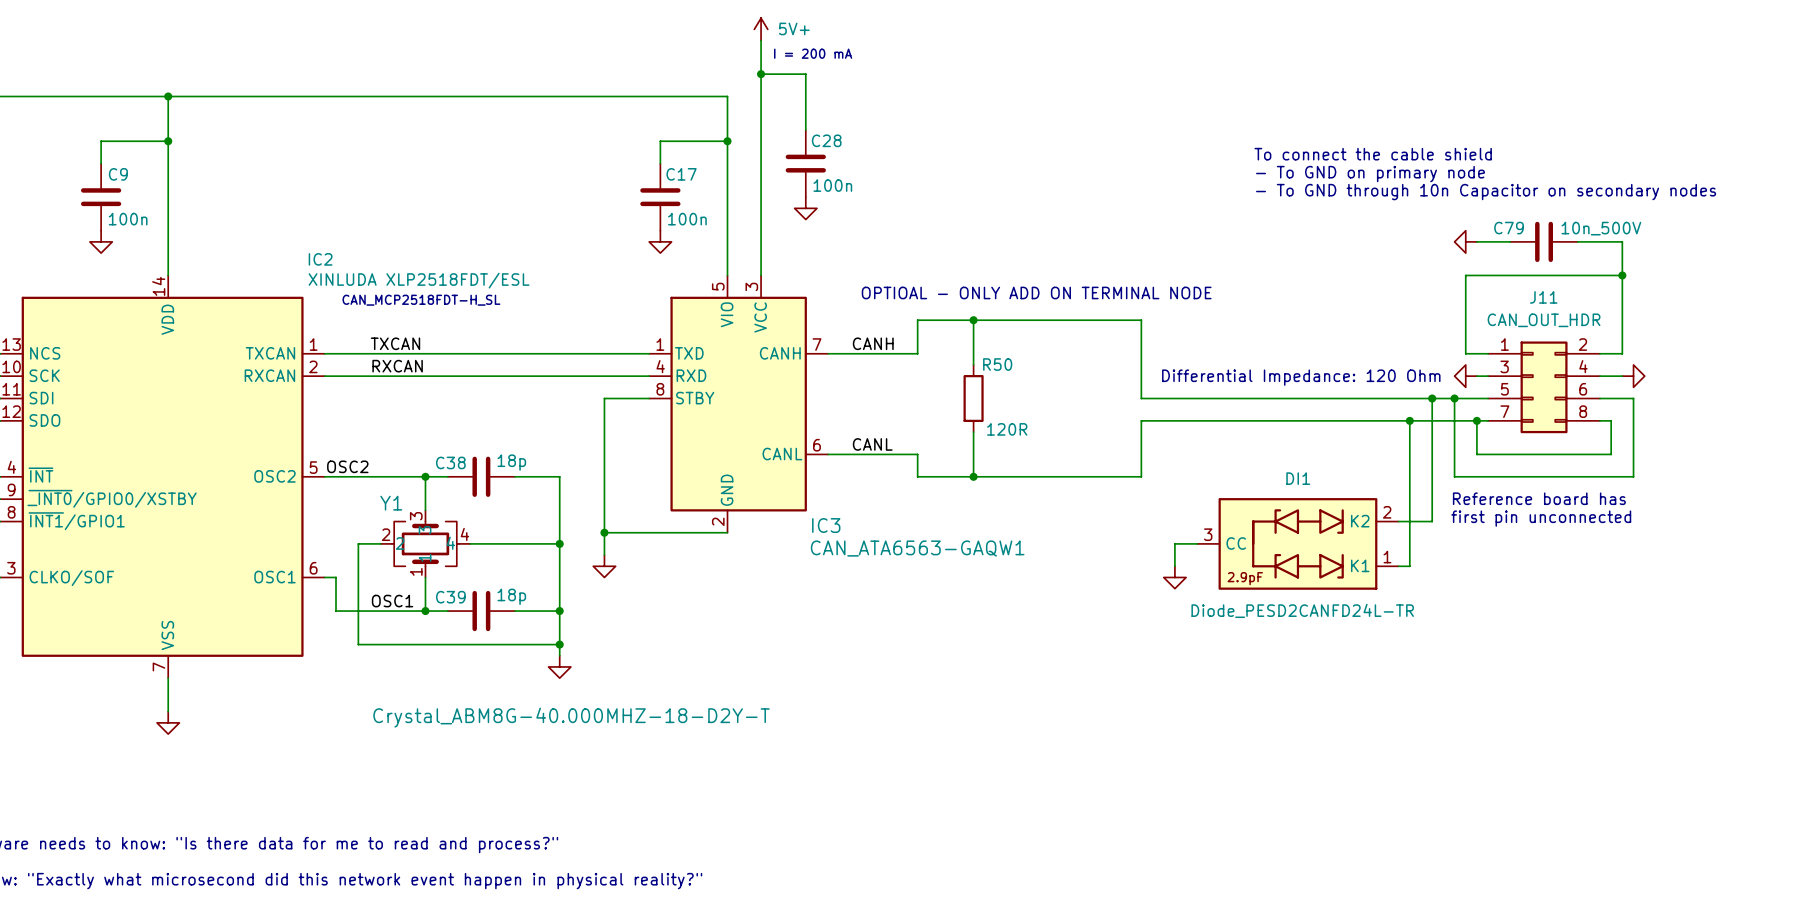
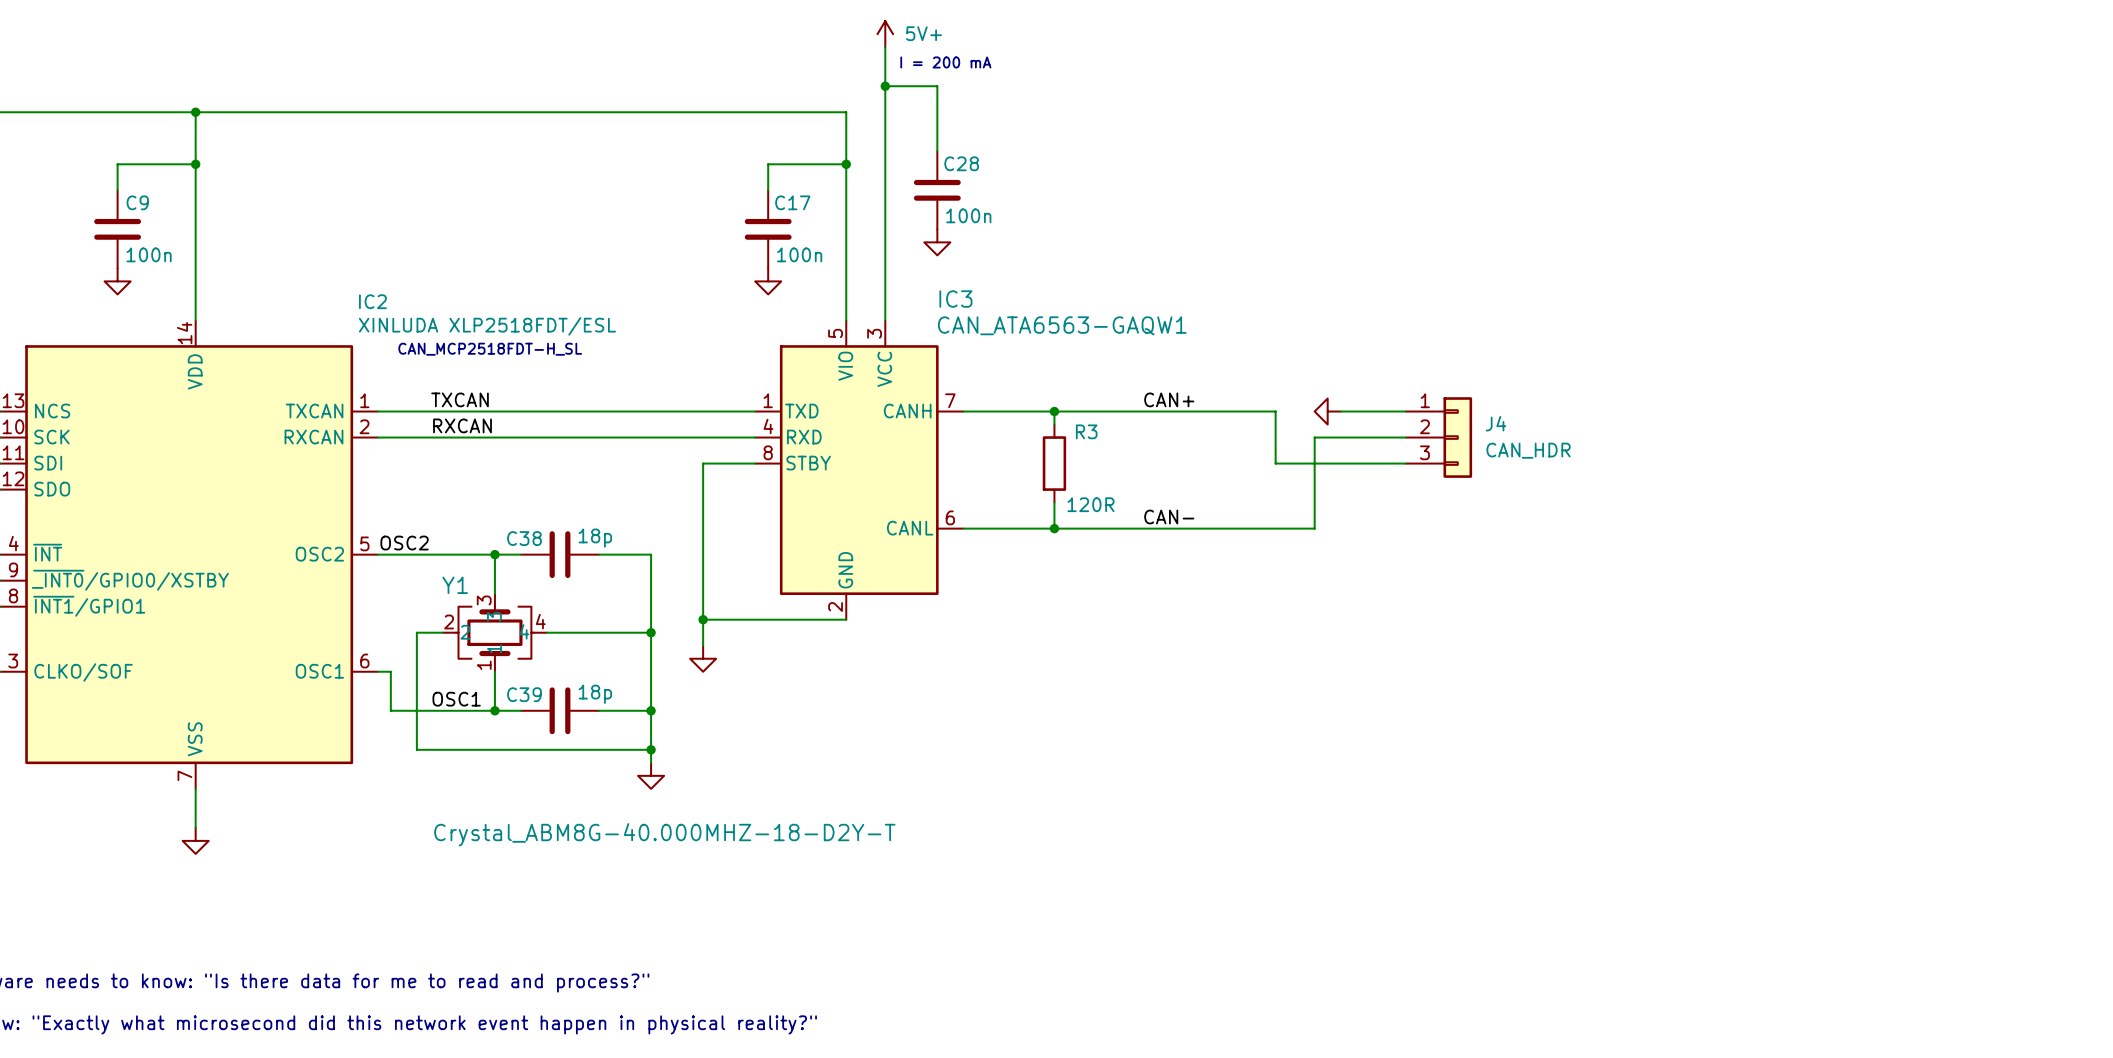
text: To connect the cable shield (1373, 154) -> none
text: - To GND on primary node (1370, 174) -> none
text: - To GND through 10n Capacitor on secondary nodes (1486, 192) -> none
power symbol: (1465, 241) -> none
wire: (1476, 241) (1510, 241) -> none
C79: 10n_500V (1544, 241) -> none
wire: (1577, 241) (1622, 241) (1622, 353) (1599, 353) -> none
wire: (1622, 275) (1465, 275) (1465, 353) (1488, 353) -> none
junction: (1622, 275) -> none
text: OPTIOAL - ONLY ADD ON TERMINAL NODE (1036, 292) -> none
wire: (973, 320) (973, 364) -> none
junction: (973, 320) -> none
label: CANH (873, 343) -> none
label: none -> CAN+ (1169, 399)
wire: none -> (1054, 411) (1054, 424)
junction: none -> (1054, 411)
wire: (917, 353) (917, 320) (1141, 320) (1141, 398) -> (1067, 411) (1275, 411) (1275, 463) (1327, 463)
power symbol: none -> (1327, 411)
wire: none -> (1340, 411) (1405, 411)
J4: none -> CAN_HDR (1438, 437)
power symbol: (1465, 376) -> none
wire: (1476, 376) (1488, 376) -> none
wire: (1599, 376) (1622, 376) -> none
power symbol: (1633, 376) -> none
text: Differential Impedance: 120 Ohm (1301, 377) -> none
J11: CAN_OUT_HDR (1544, 387) -> none
R3: none -> 120R (1054, 463)
R50: 120R (973, 398) -> none
wire: (1208, 398) (1488, 398) -> none
wire: (1432, 398) (1432, 521) (1398, 521) -> none
junction: (1432, 398) -> none
wire: (1454, 398) (1454, 476) (1633, 476) (1633, 398) (1599, 398) -> none
junction: (1454, 398) -> none
wire: (1409, 420) (1409, 566) (1398, 566) -> none
junction: (1409, 420) -> none
wire: (1476, 420) (1476, 454) (1611, 454) (1611, 420) (1599, 420) -> none
junction: (1476, 420) -> none
wire: (1488, 420) (1141, 420) (1141, 476) (917, 476) (917, 454) -> (1405, 437) (1314, 437) (1314, 528) (1067, 528)
wire: none -> (1054, 502) (1054, 528)
wire: (973, 432) (973, 476) -> none
label: CANL (872, 444) -> none
label: none -> CAN- (1169, 517)
junction: none -> (1054, 528)
junction: (973, 476) -> none
text: Reference board has (1539, 498) -> none
text: first pin unconnected (1541, 518) -> none
IC3 name position: IC3 (826, 525) -> IC3 (955, 299)
wire: (1197, 543) (1174, 543) (1174, 566) -> none
DI1: Diode_PESD2CANFD24L-TR (1297, 543) -> none
IC3 value position: CAN_ATA6563-GAQW1 (917, 548) -> CAN_ATA6563-GAQW1 (1062, 325)
power symbol: (1174, 577) -> none

